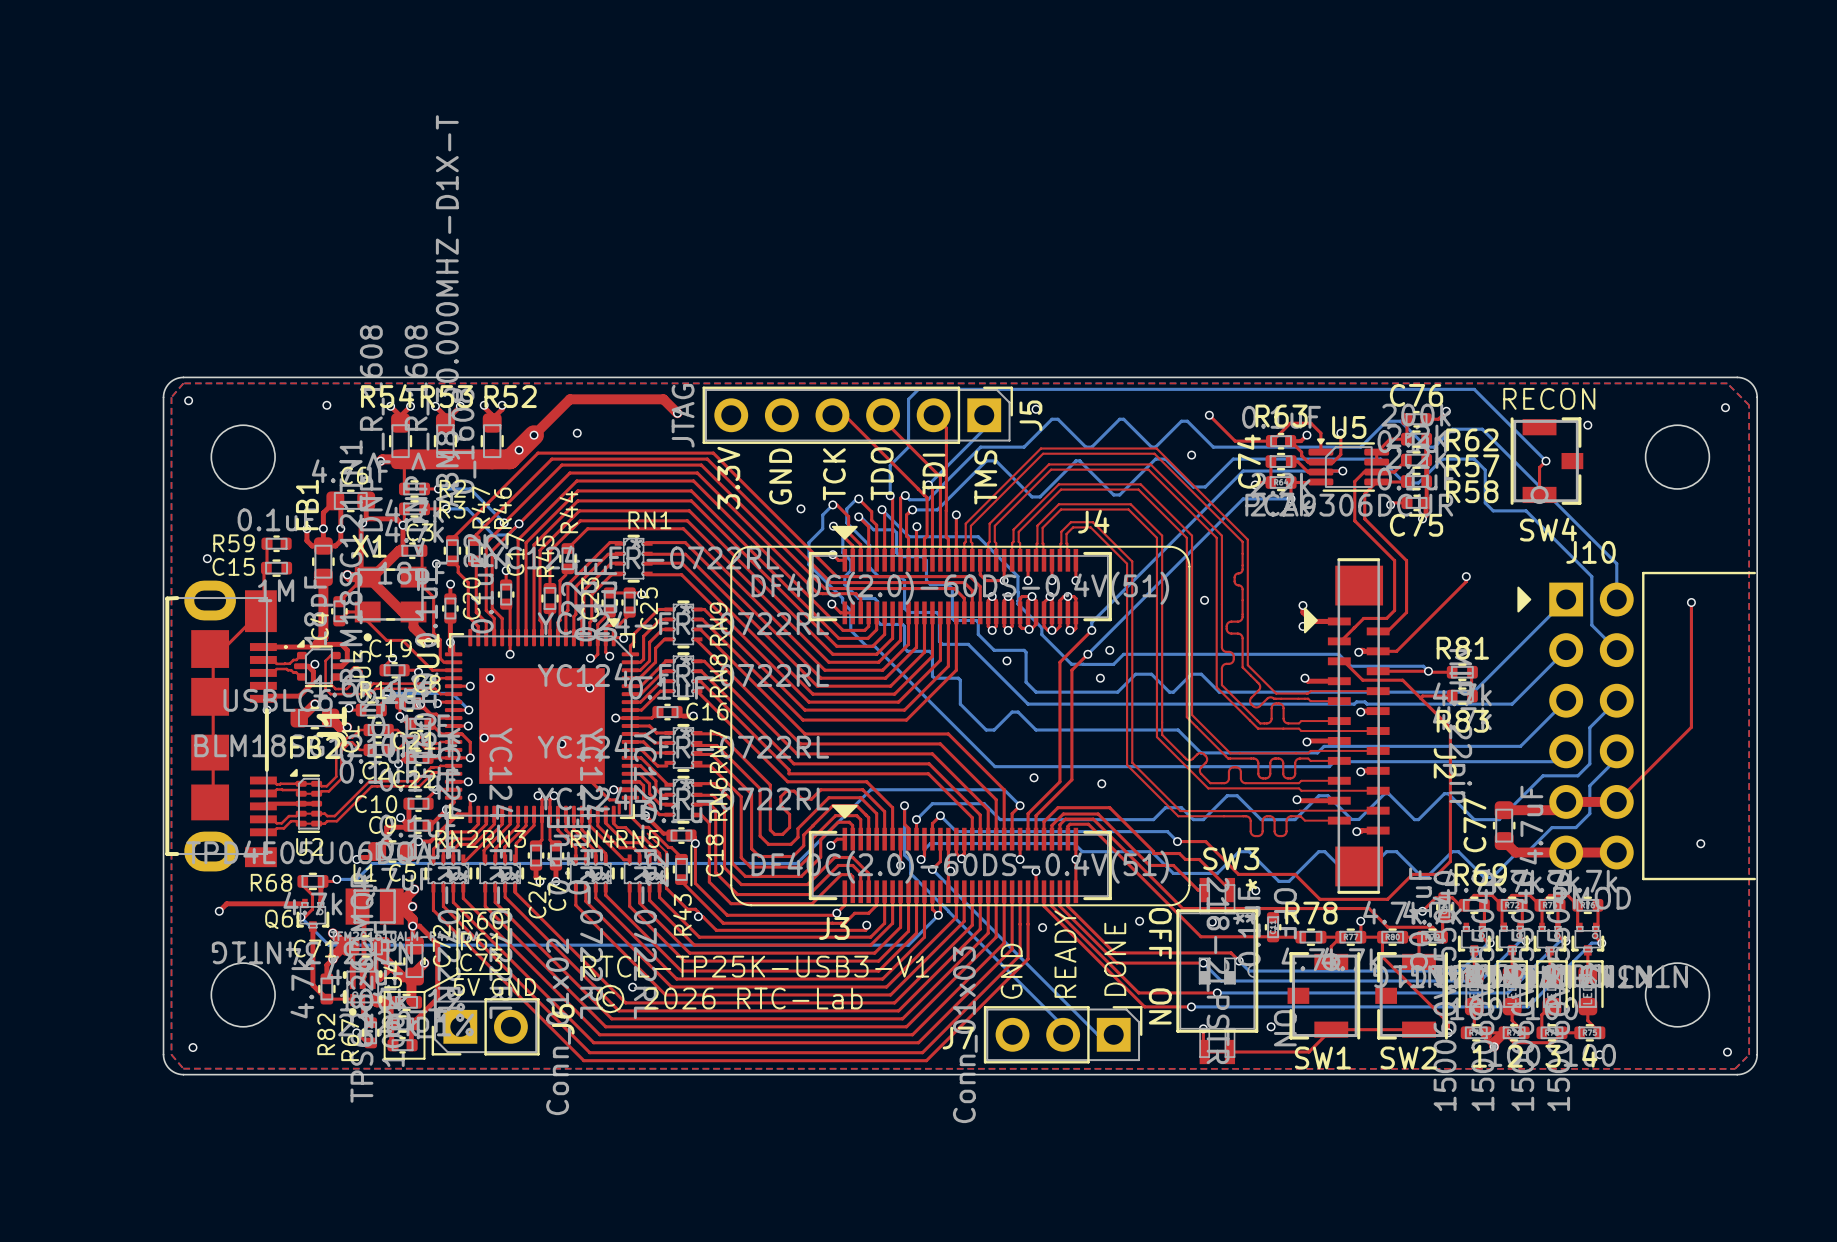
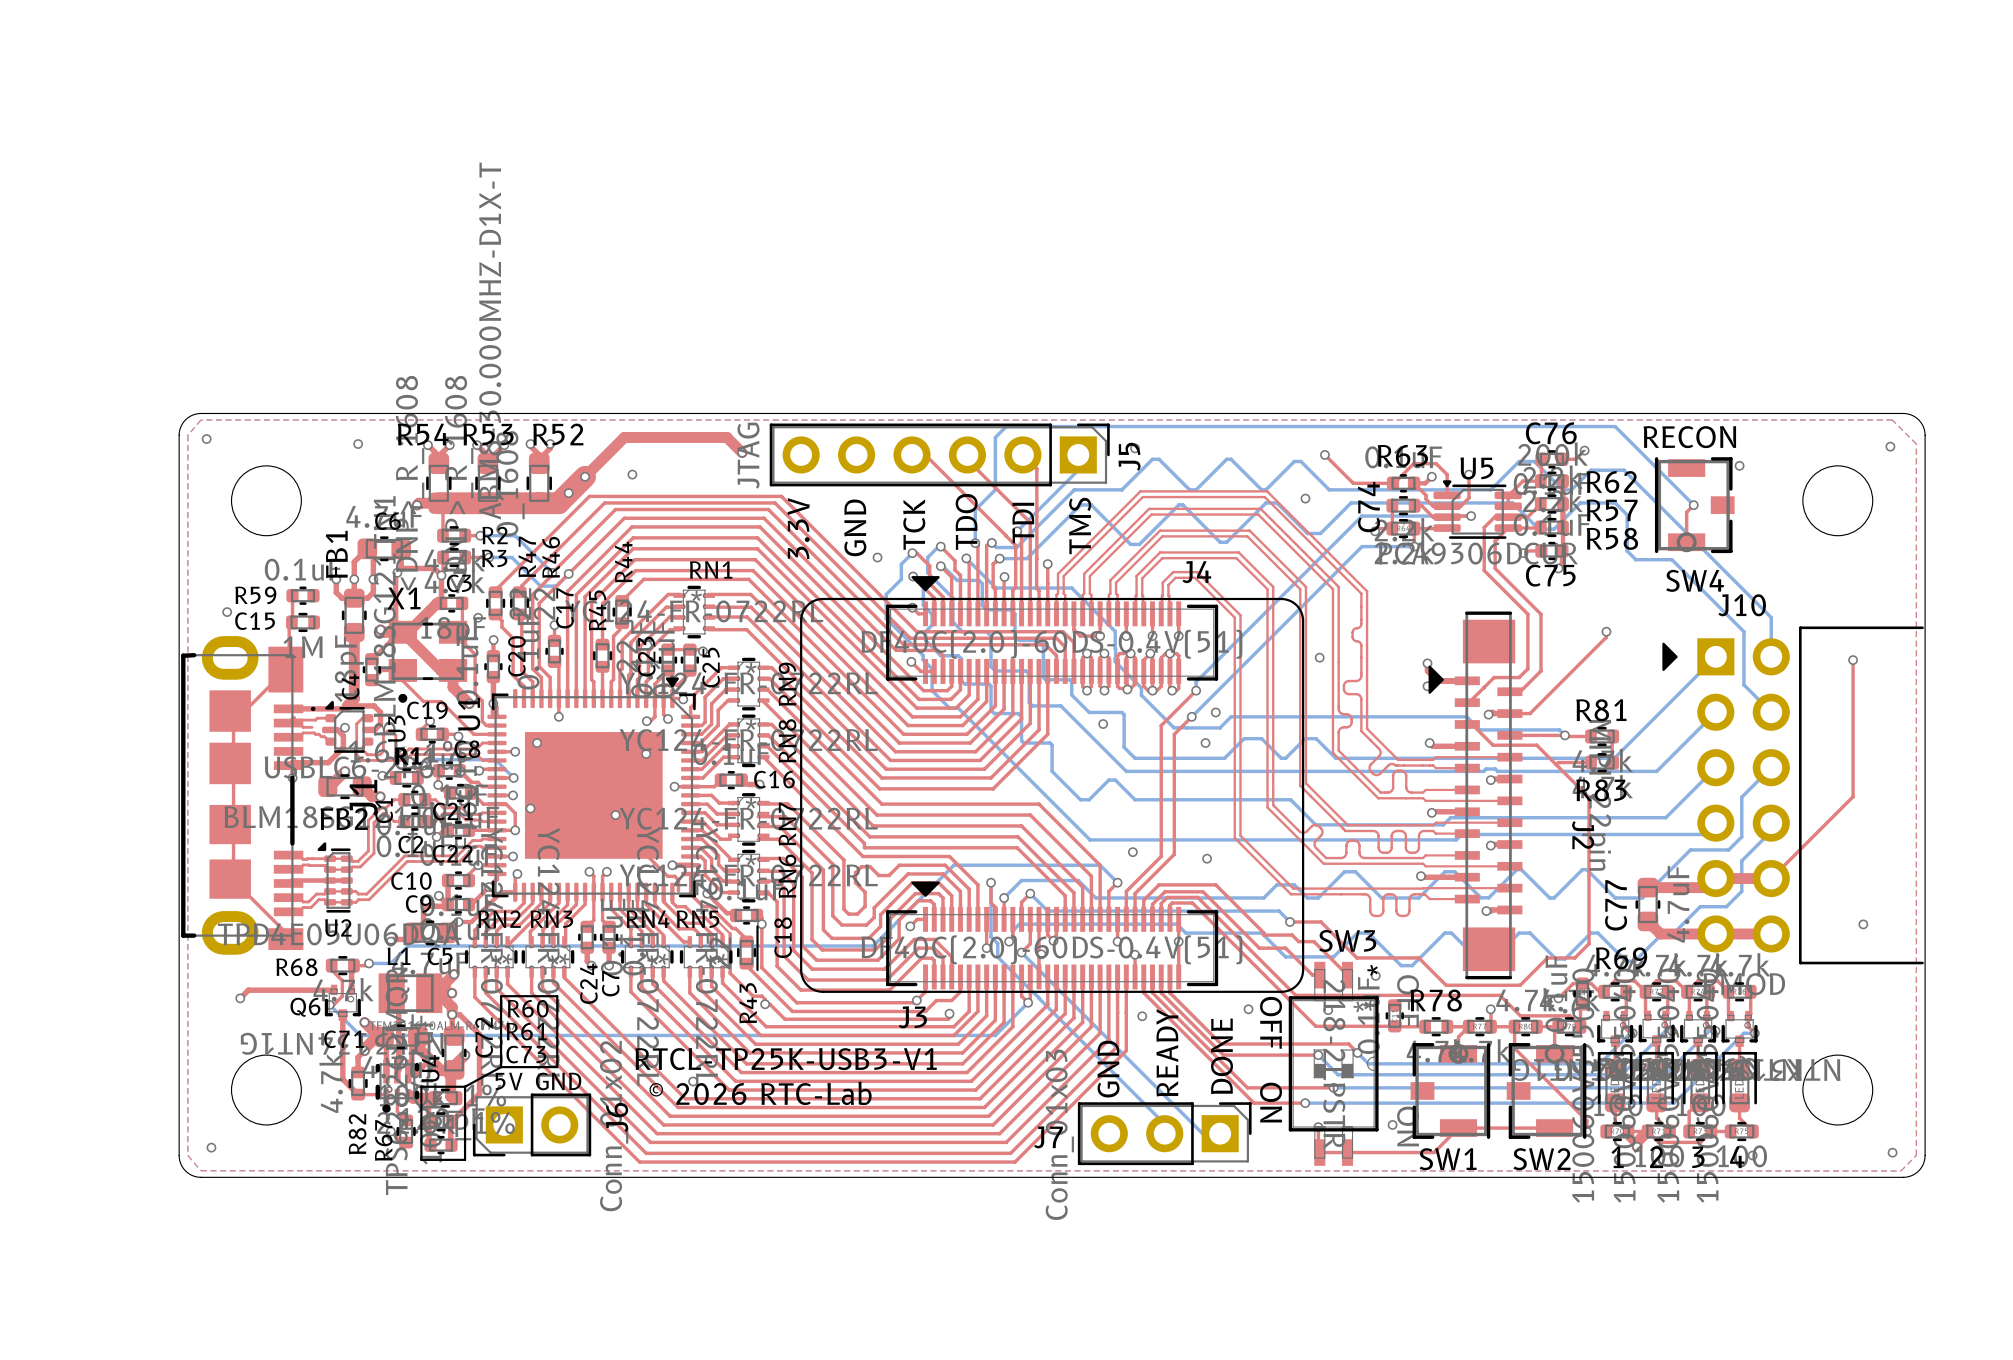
top track: (300, 655) (289, 663) (285, 663) -> (329, 718) (291, 720) (293, 718)
top track: none -> (233, 880) (289, 936)

